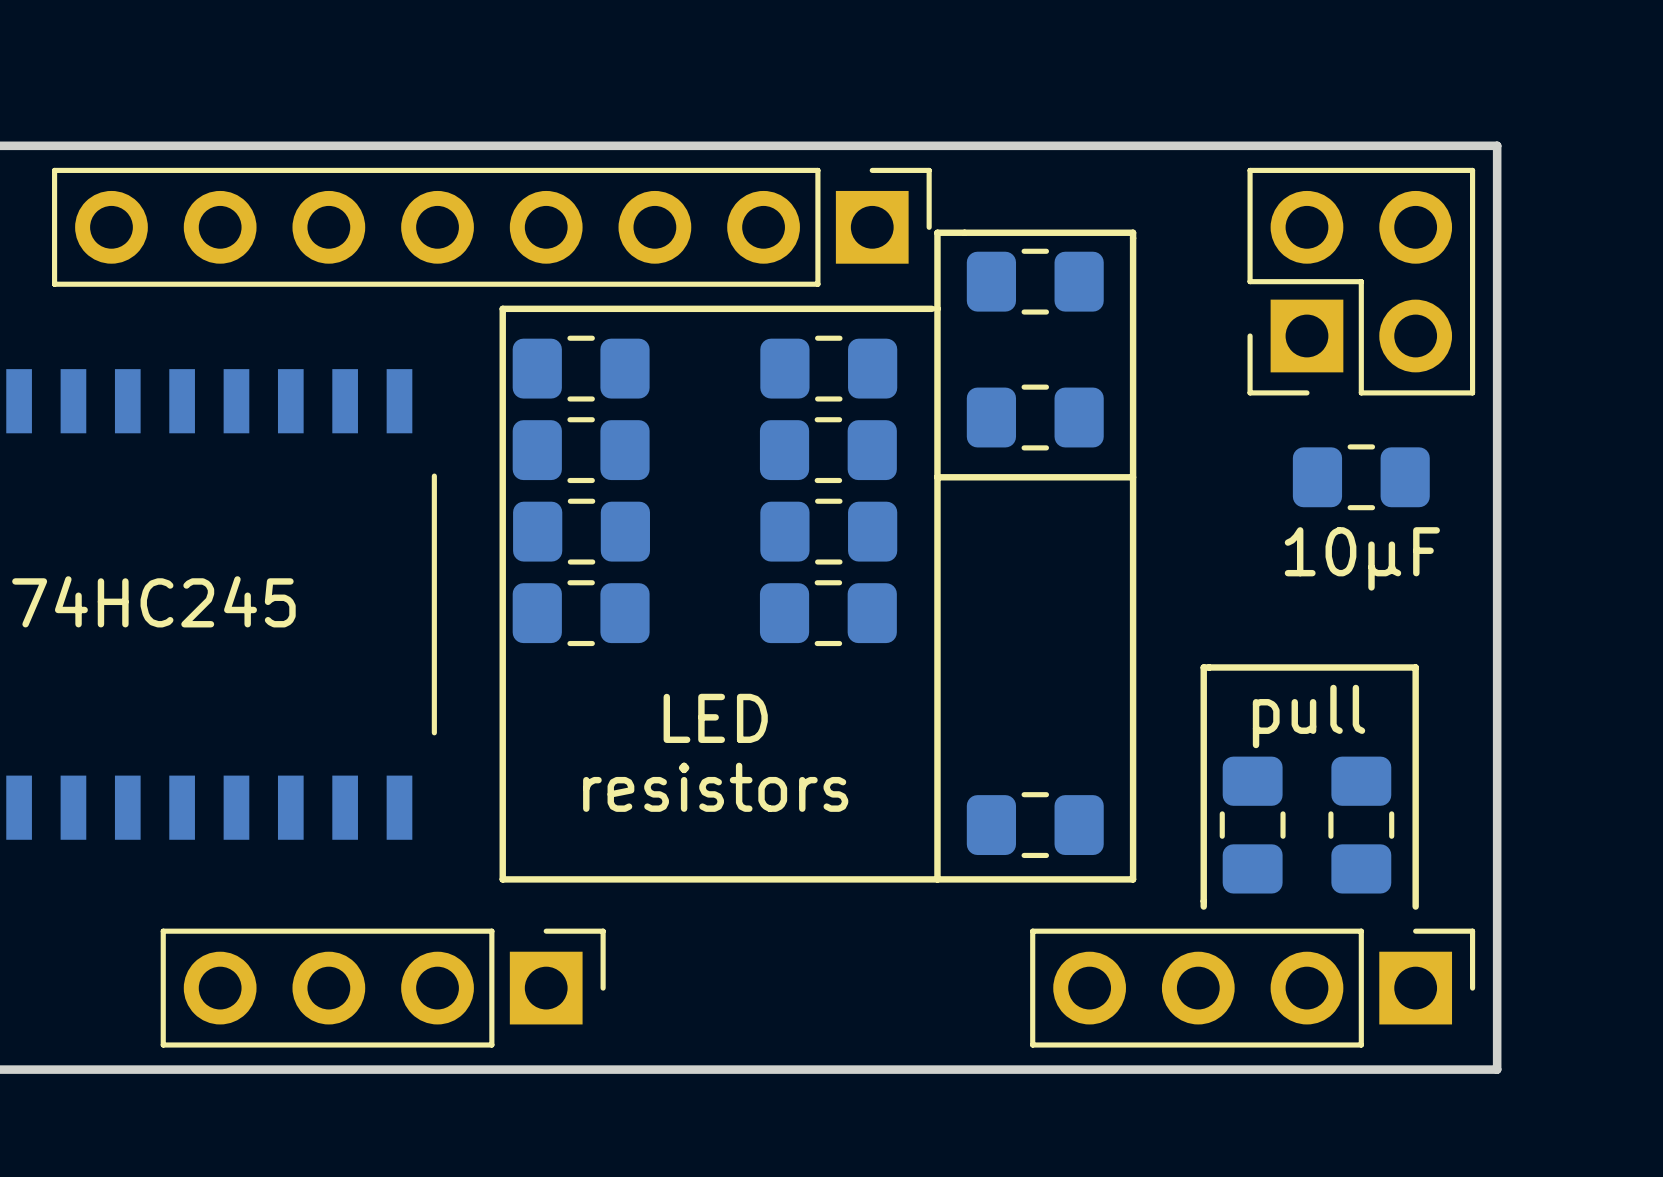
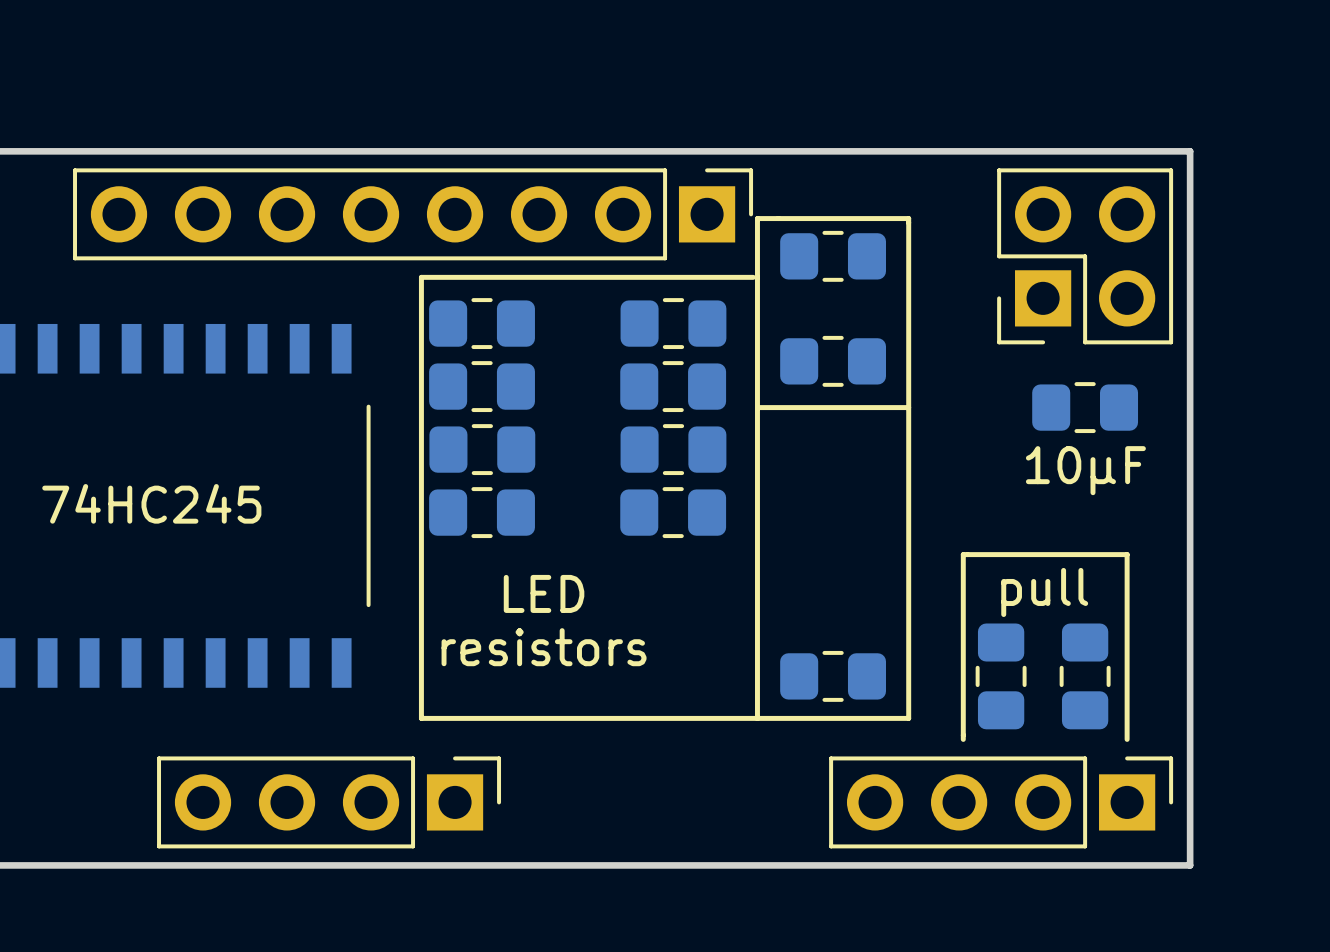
text position: LED (715, 718) -> LED (544, 593)
text position: resistors (715, 787) -> resistors (544, 647)

